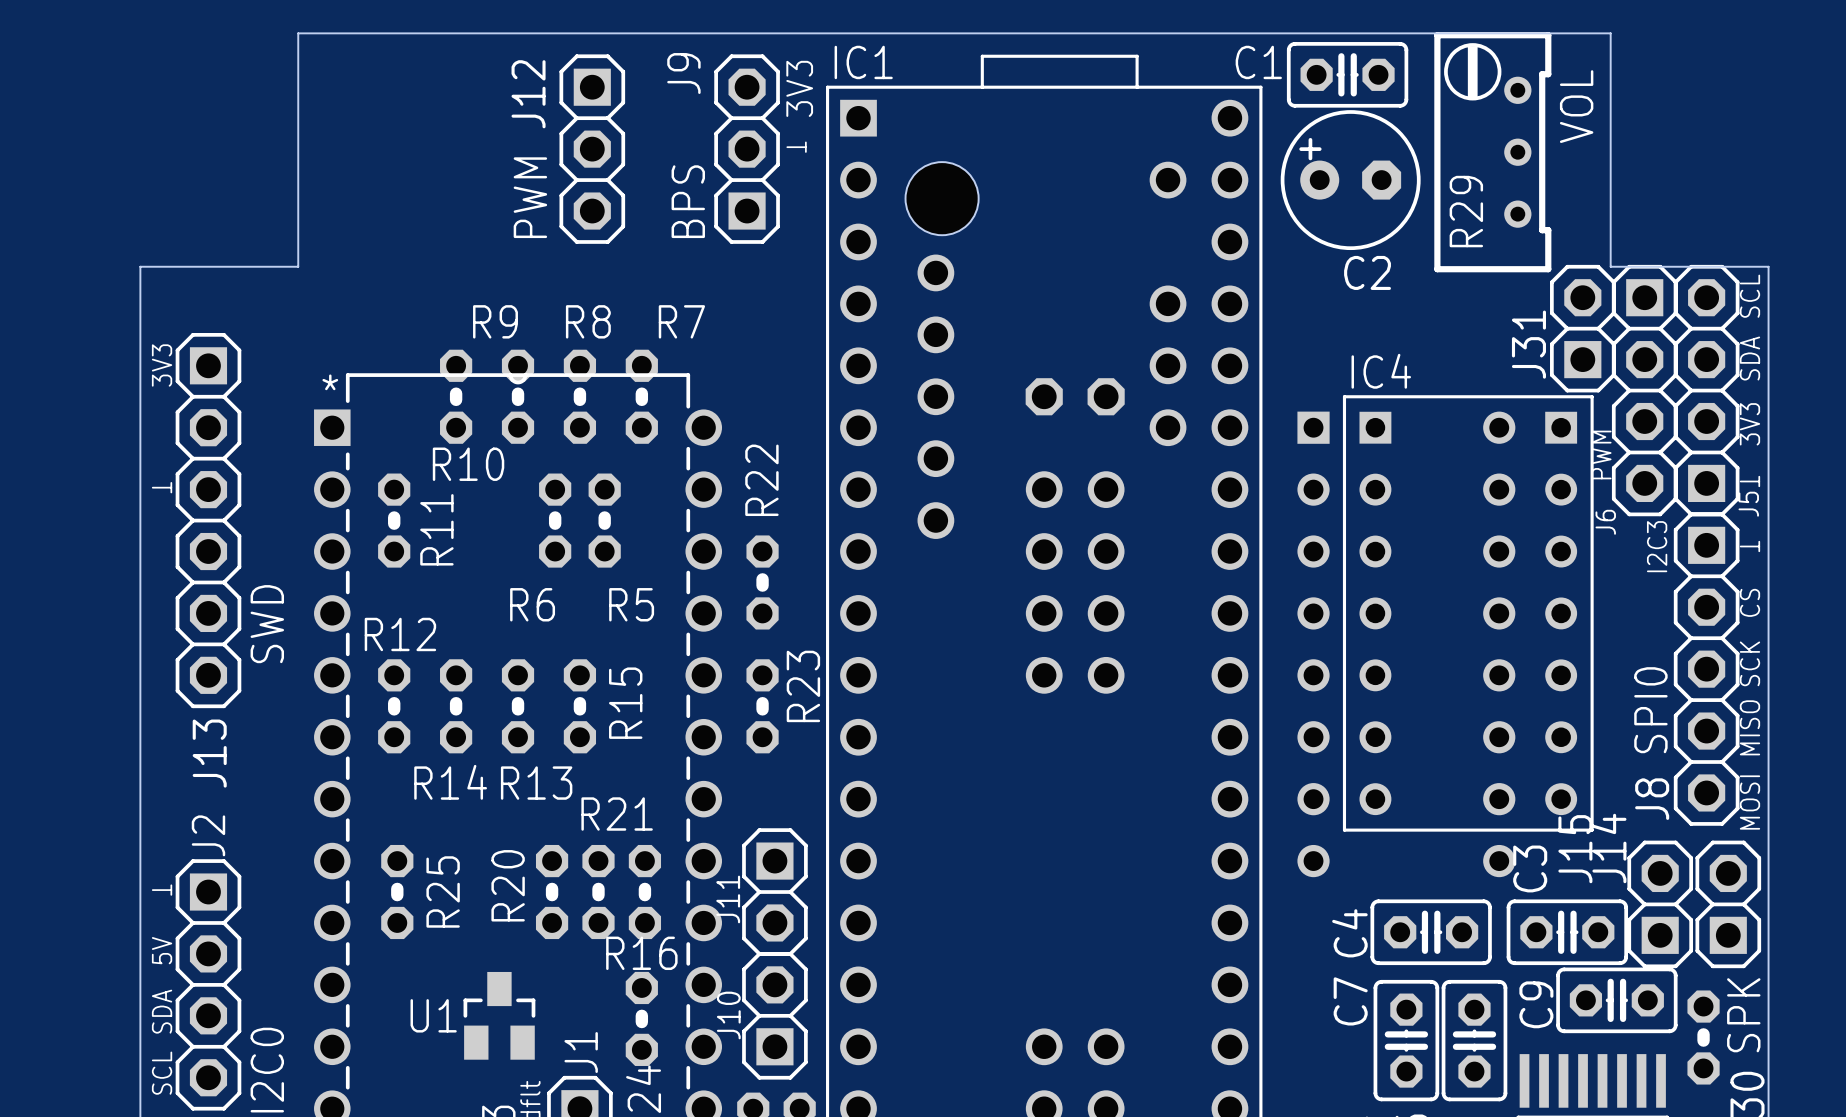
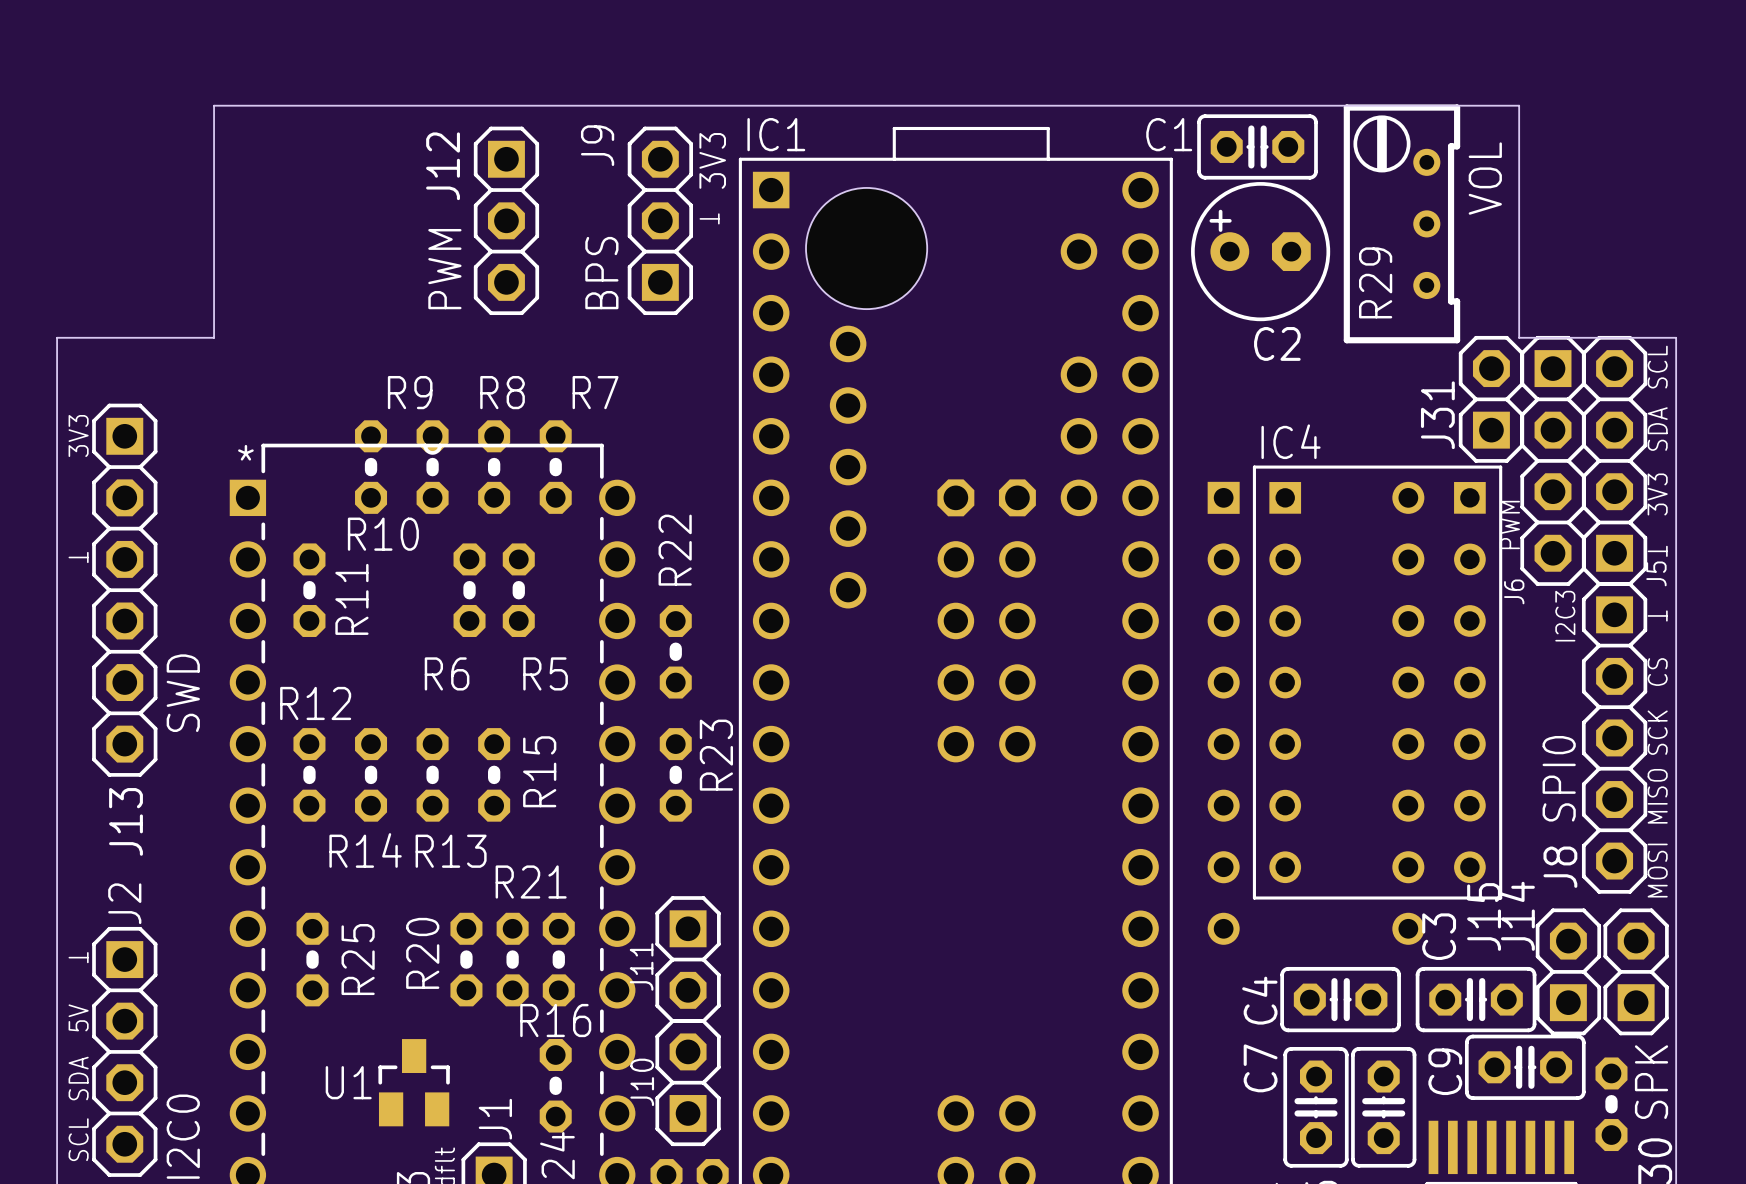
hole: none -> (866, 248)
hole: (942, 198) -> none
part position: (1075, 396) -> (986, 497)

